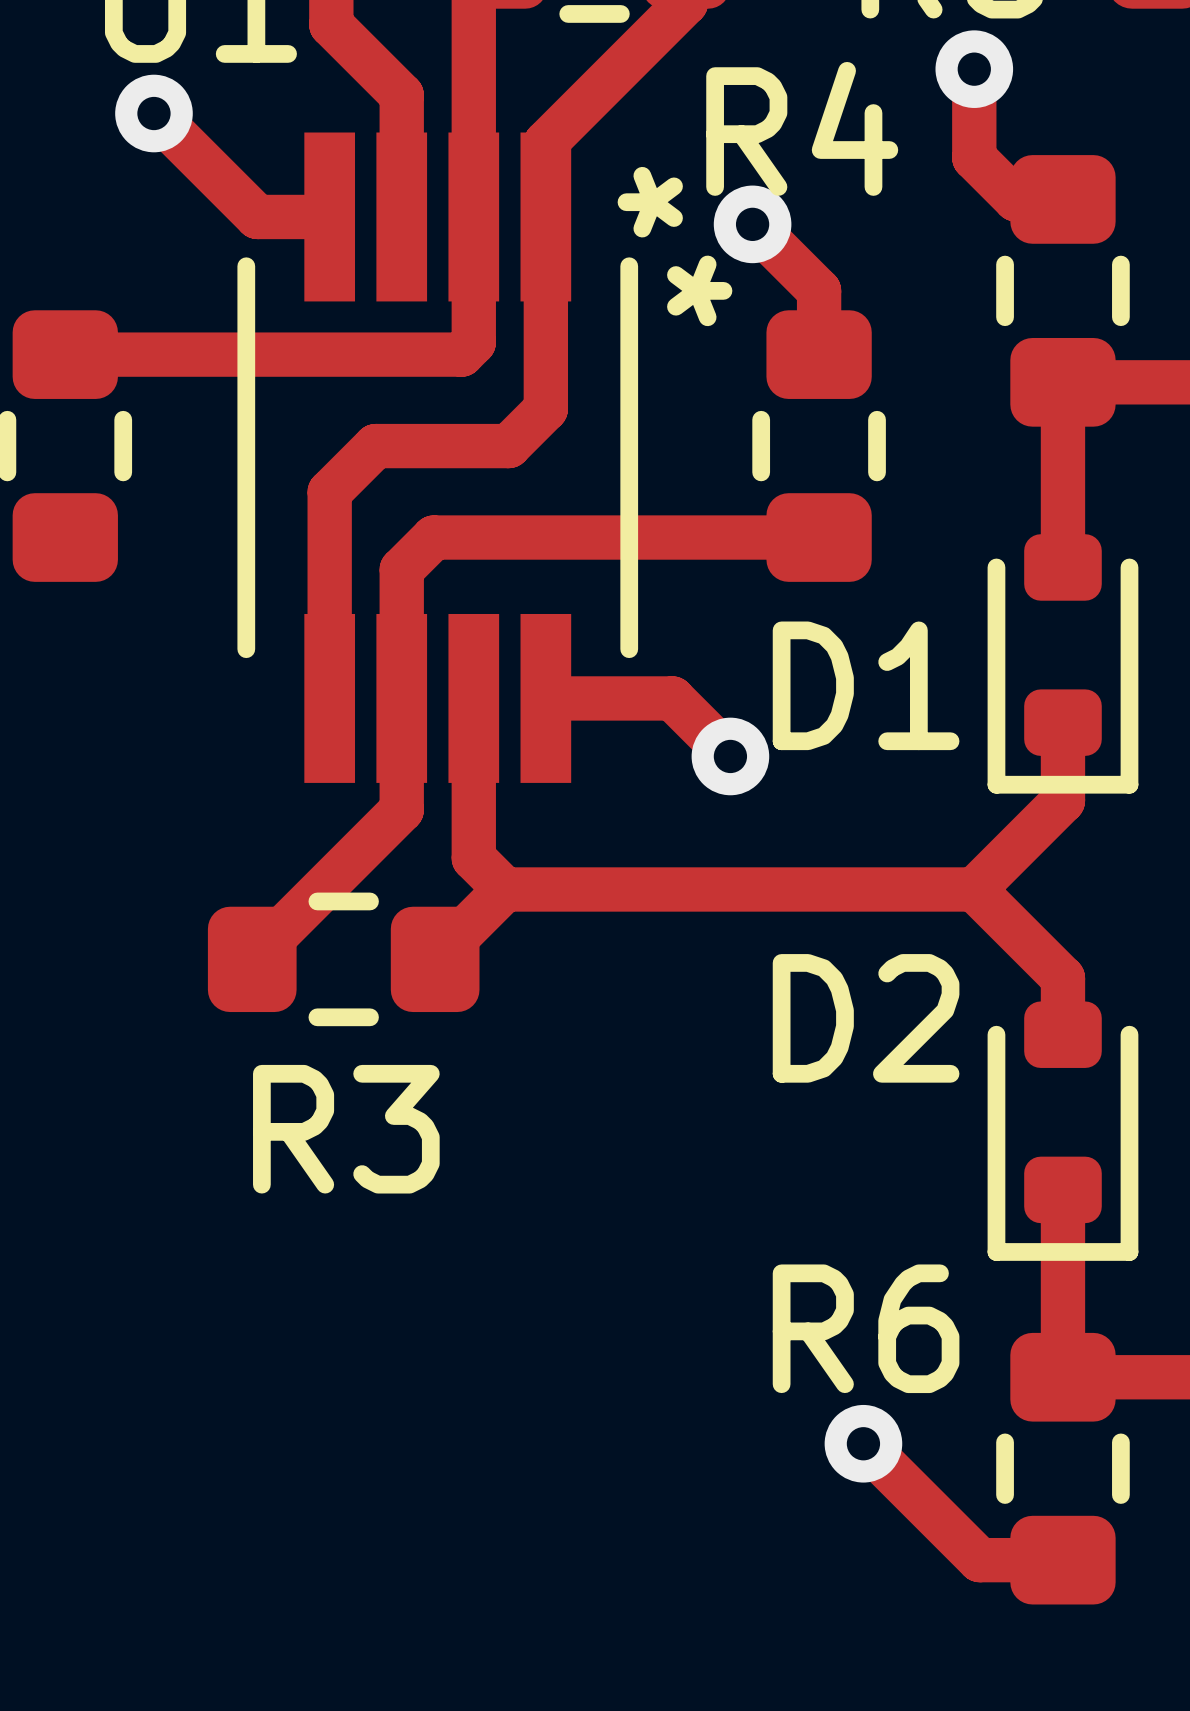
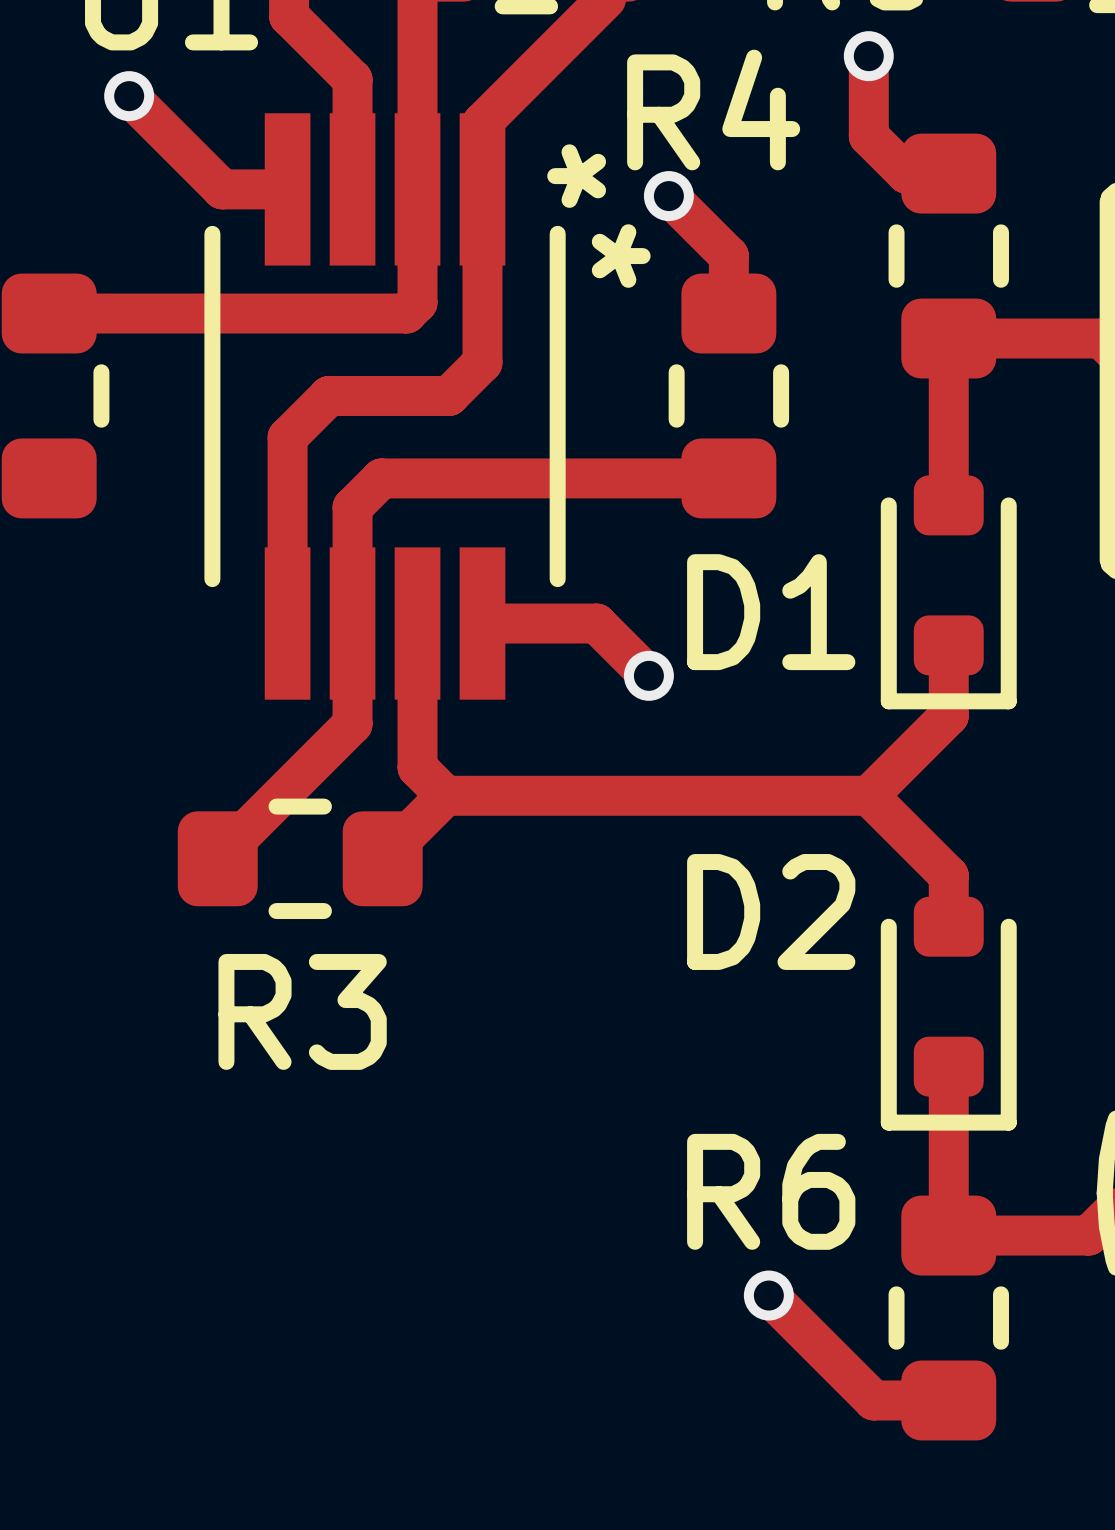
via size: [935, 30, 1014, 108] -> [843, 31, 894, 82]
via size: [115, 74, 193, 153] -> [104, 71, 155, 122]
via size: [713, 185, 792, 264] -> [643, 171, 694, 222]
via size: [691, 717, 770, 796] -> [623, 650, 674, 701]
via size: [824, 1404, 903, 1483] -> [743, 1270, 794, 1321]

